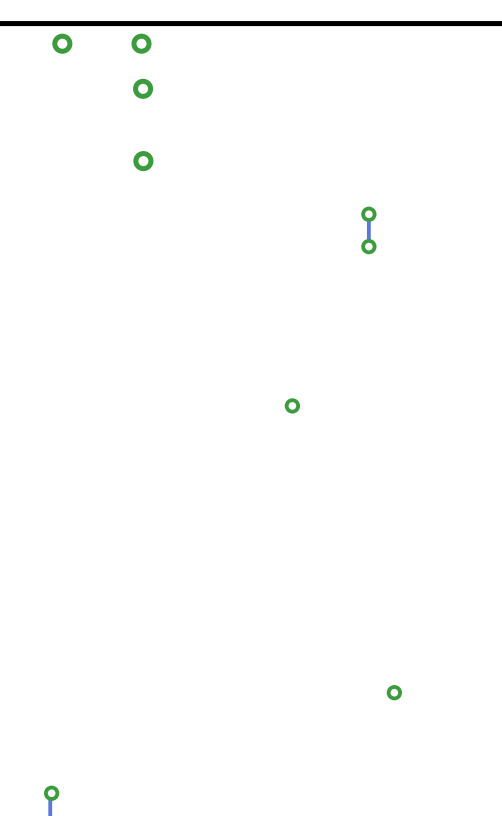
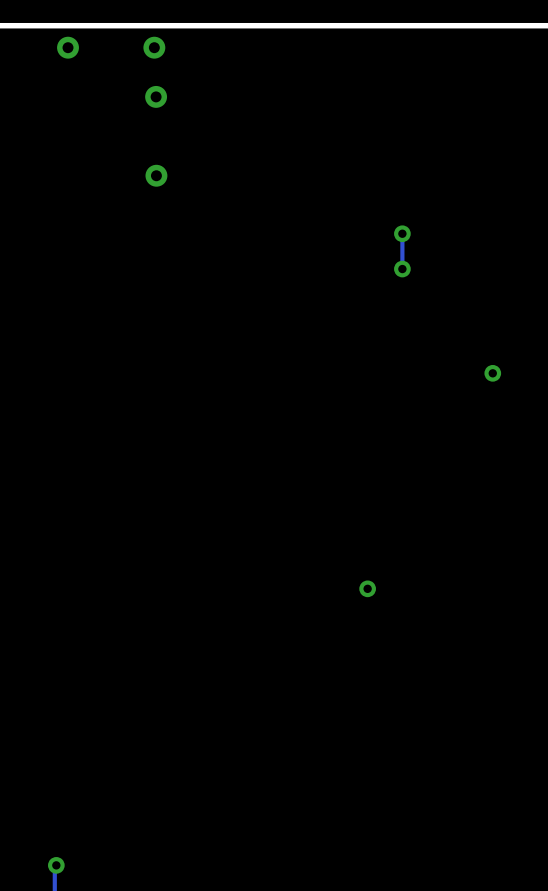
via: none -> (492, 373)
via: (292, 405) -> none
via: none -> (367, 588)
via: (394, 692) -> none

